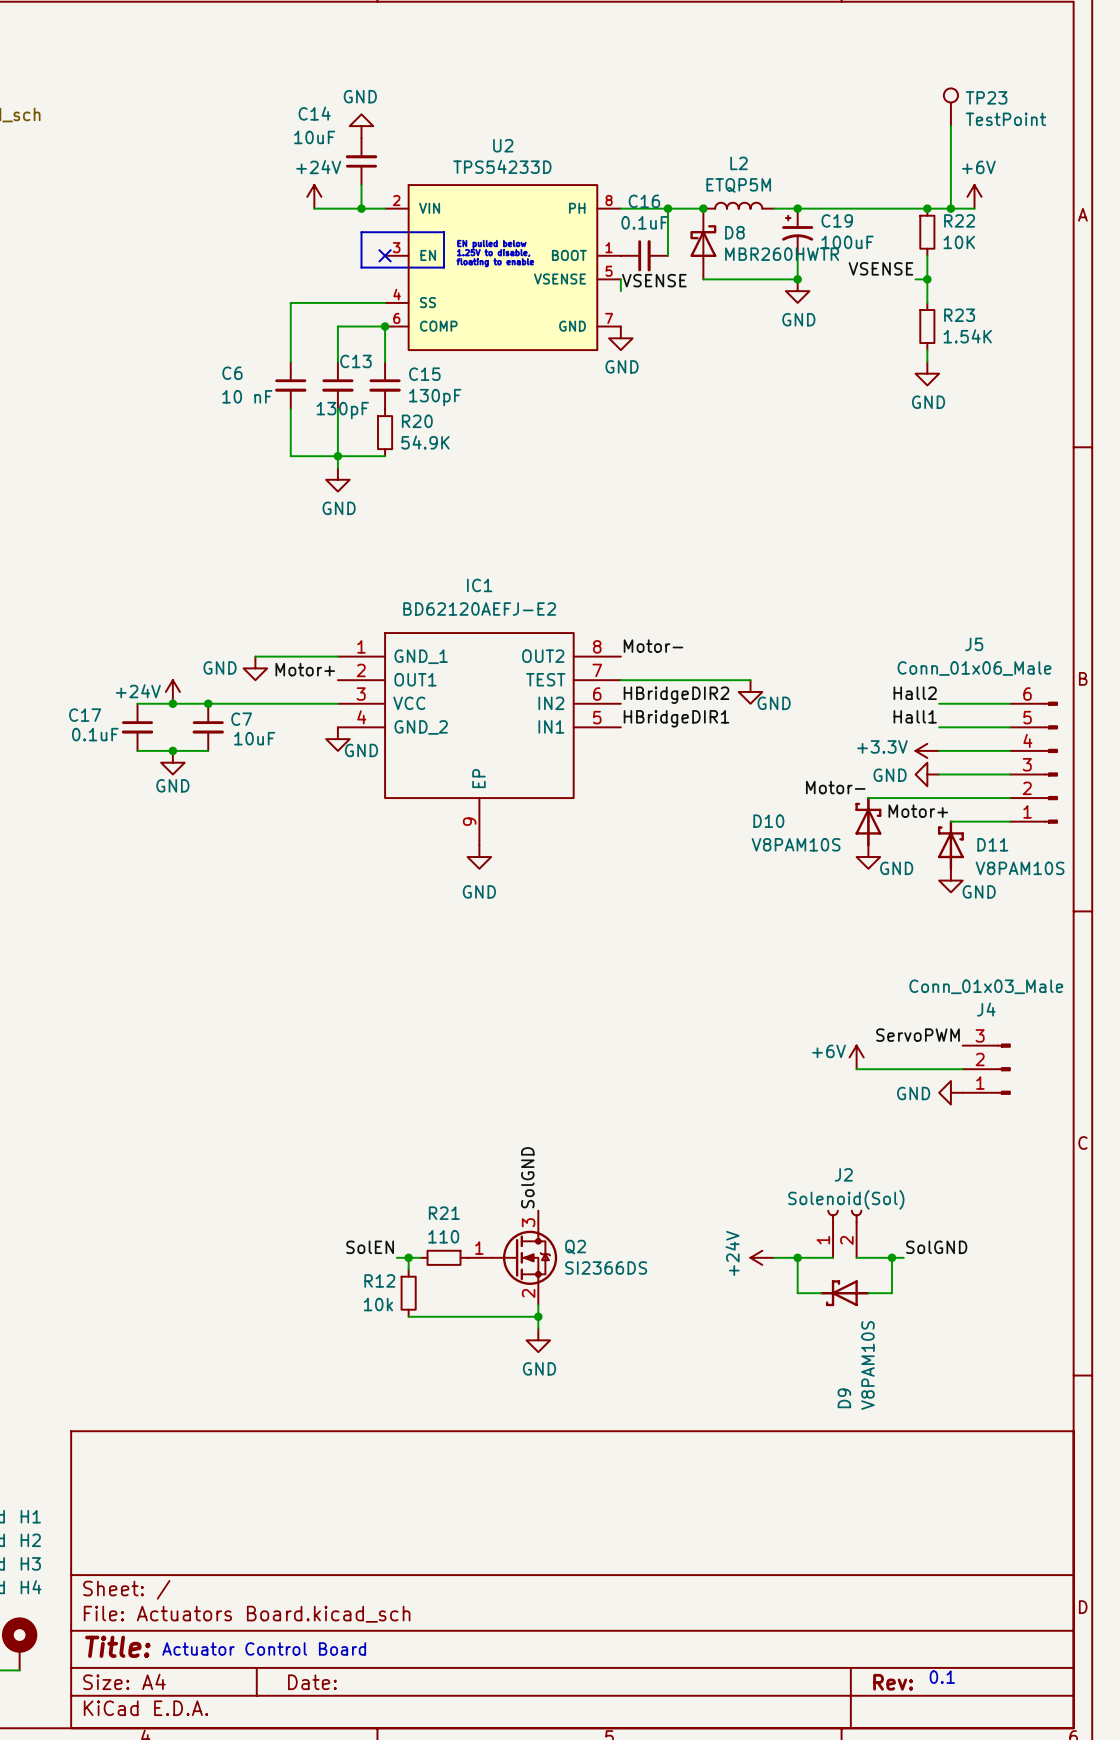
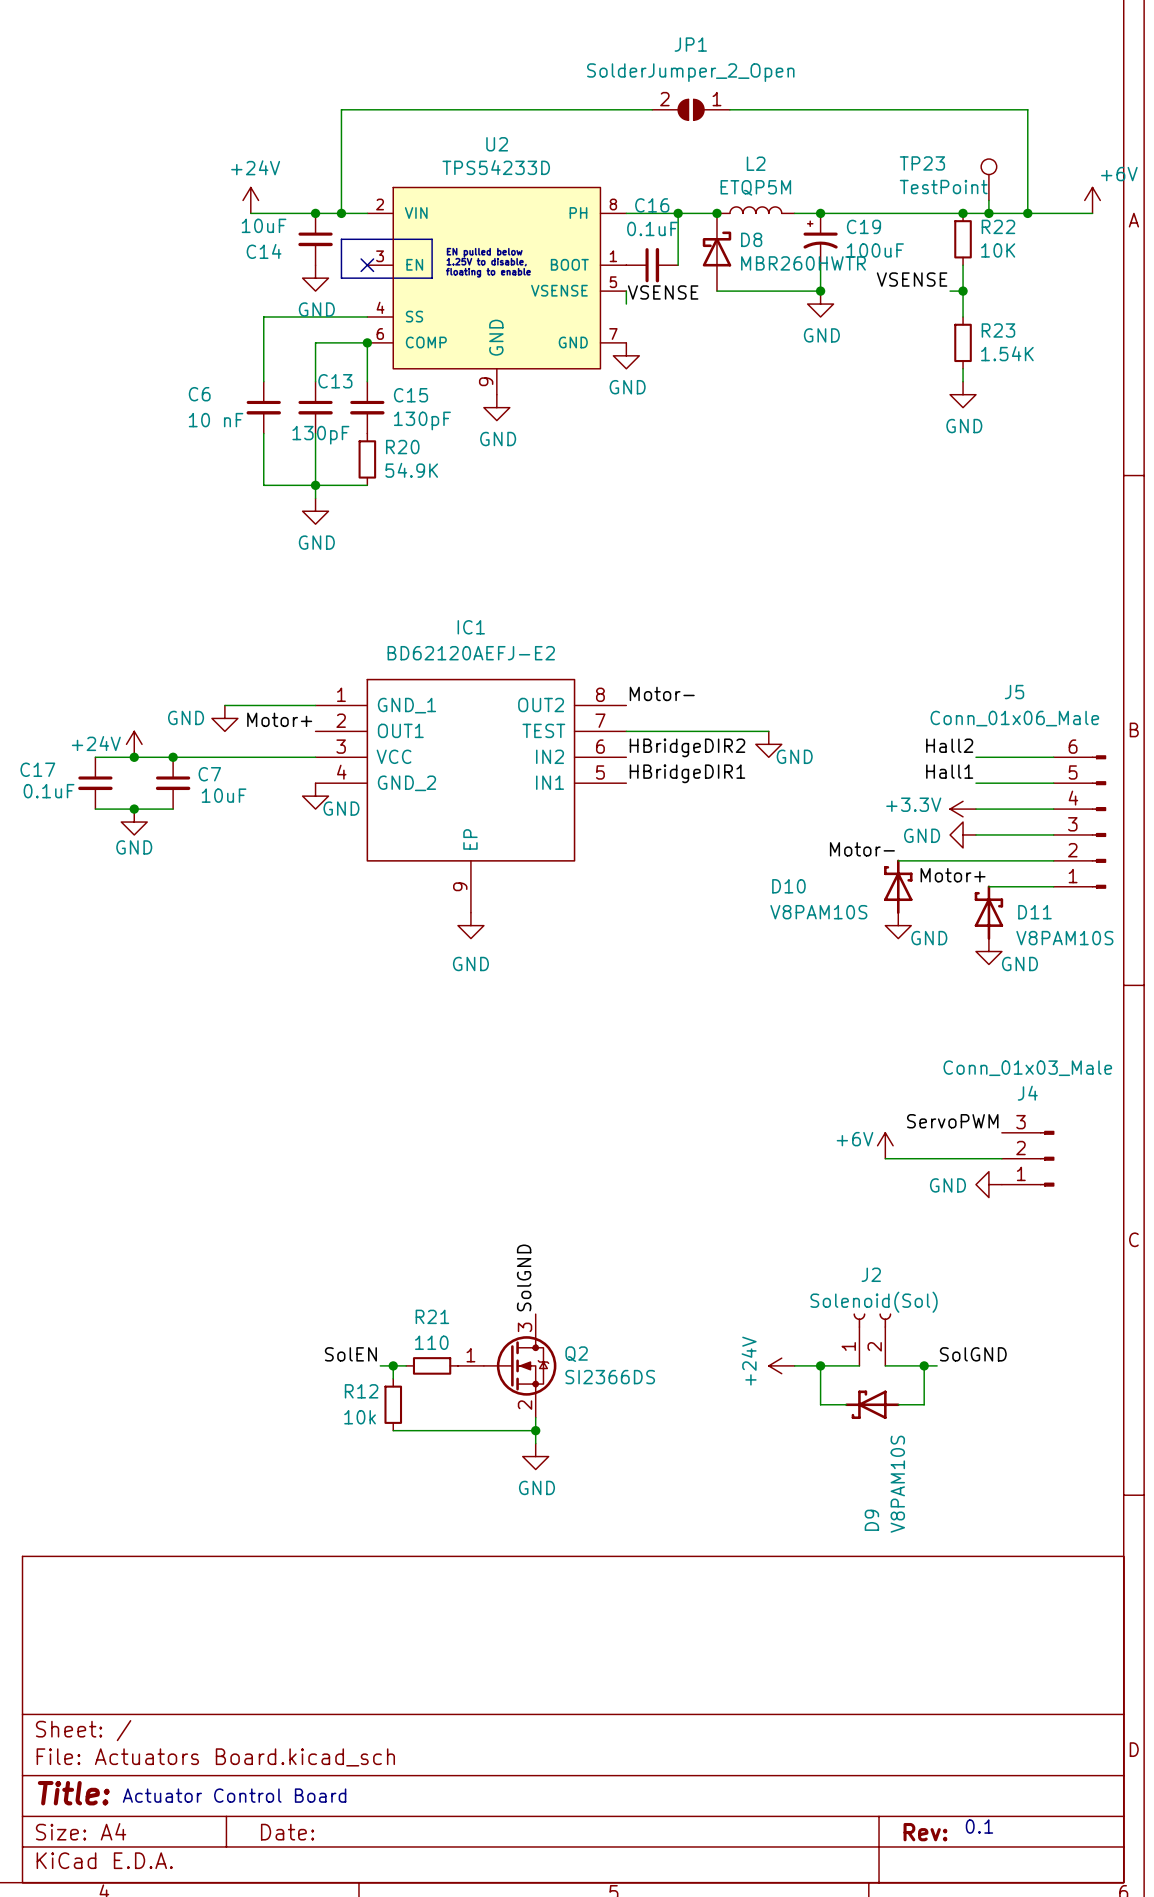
TP23 name position: TP23 (986, 97) -> TP23 (922, 163)
TP23 position: (950, 107) -> (988, 179)
C14 name position: C14 (314, 113) -> C14 (264, 251)
wire: none -> (652, 109) (341, 109) (341, 187)
JP1: none -> SolderJumper_2_Open (691, 109)
wire: none -> (729, 109) (1027, 109) (1027, 213)
TP23 value position: TestPoint (1005, 119) -> TestPoint (943, 187)
power symbol rotation: 0° (361, 126) -> 180° (315, 278)
power symbol position: GND (361, 126) -> GND (315, 278)
wire: (950, 126) (950, 196) -> none
C14 rotation: 0° (361, 161) -> 180° (315, 239)
C14 position: (361, 161) -> (315, 239)
power symbol text position: +6V (978, 167) -> +6V (1119, 174)
U2 symbol: [385, 185, 621, 351] -> [367, 187, 627, 395]
power symbol position: +24V (314, 196) -> +24V (250, 200)
power symbol position: +6V (974, 196) -> +6V (1092, 200)
wire: none -> (250, 213) (289, 213)
junction: none -> (315, 213)
wire: none -> (1014, 213) (1092, 213)
junction: none -> (1027, 213)
power symbol: none -> GND (496, 407)

